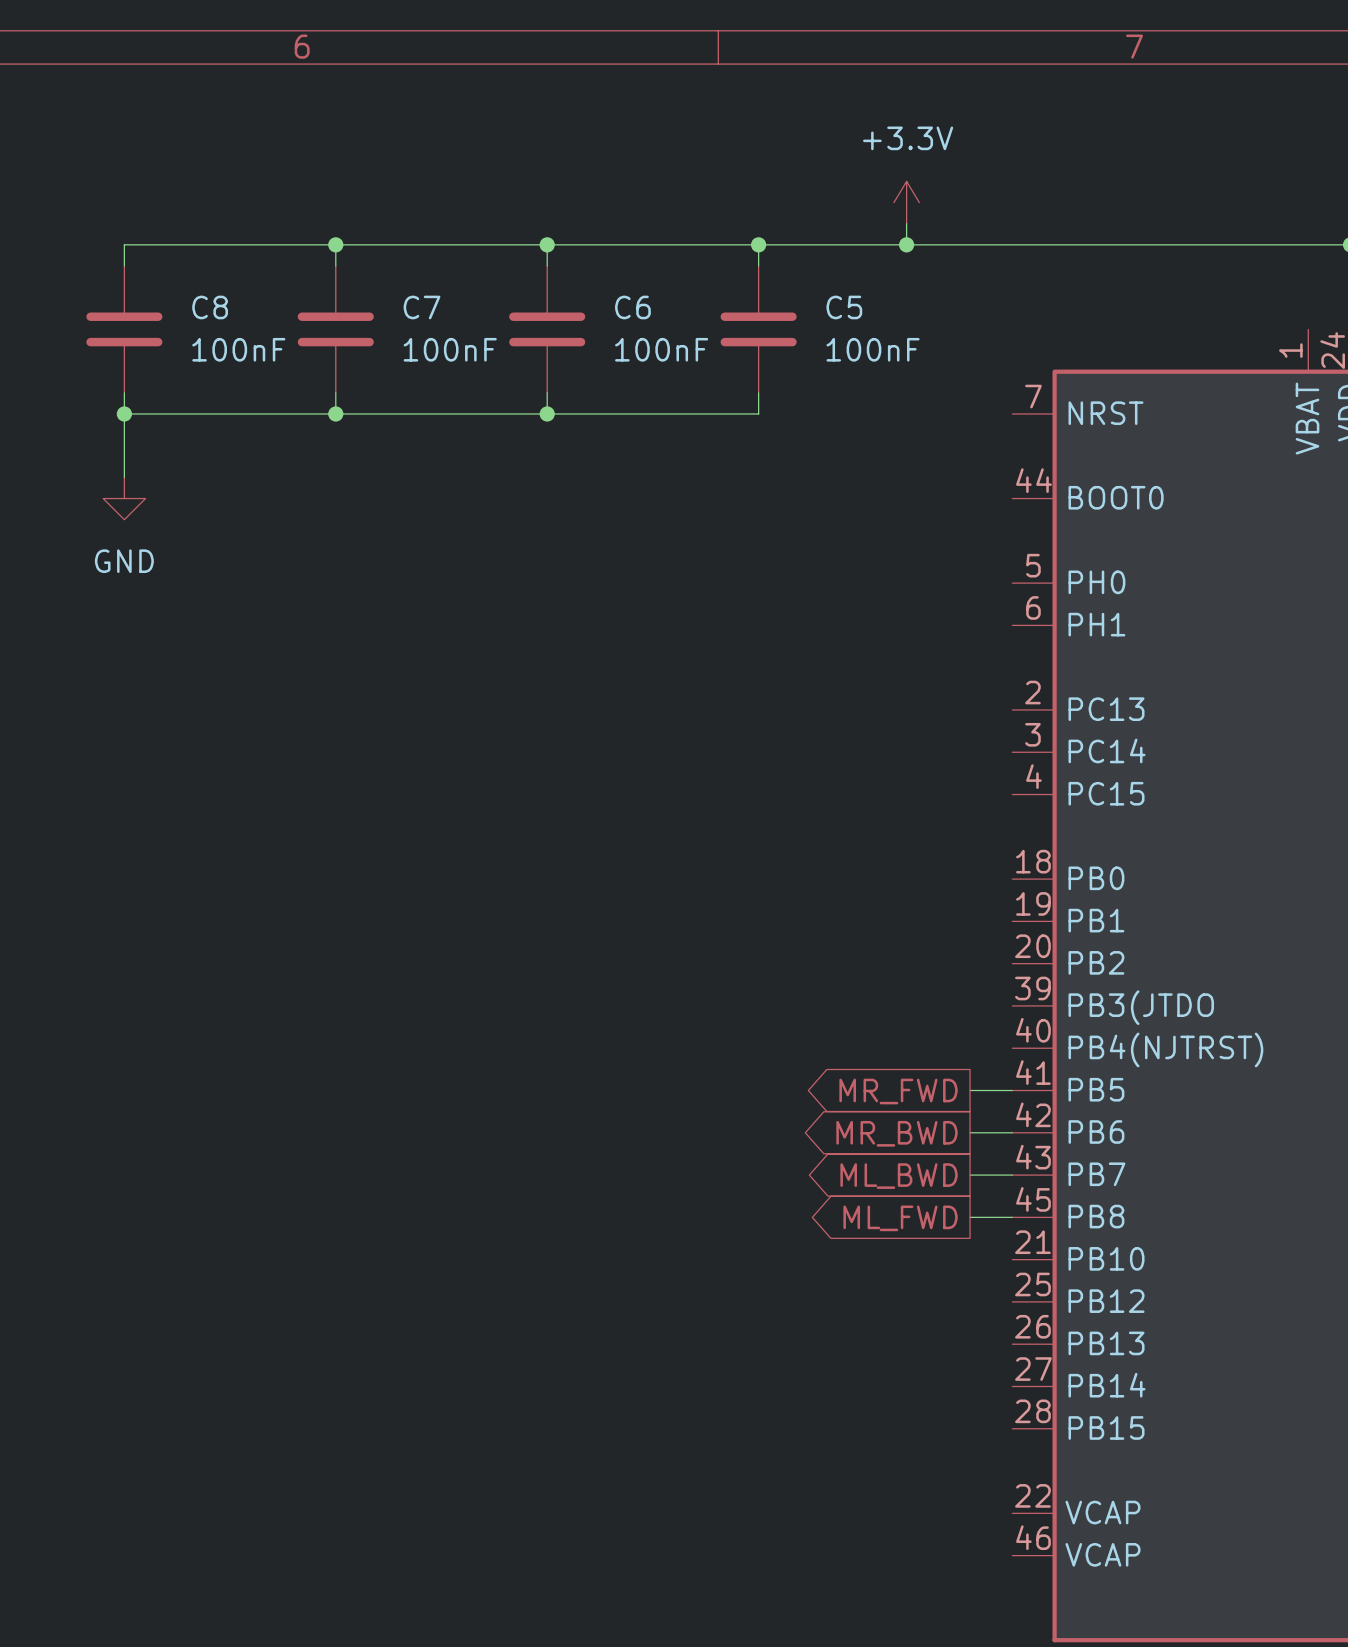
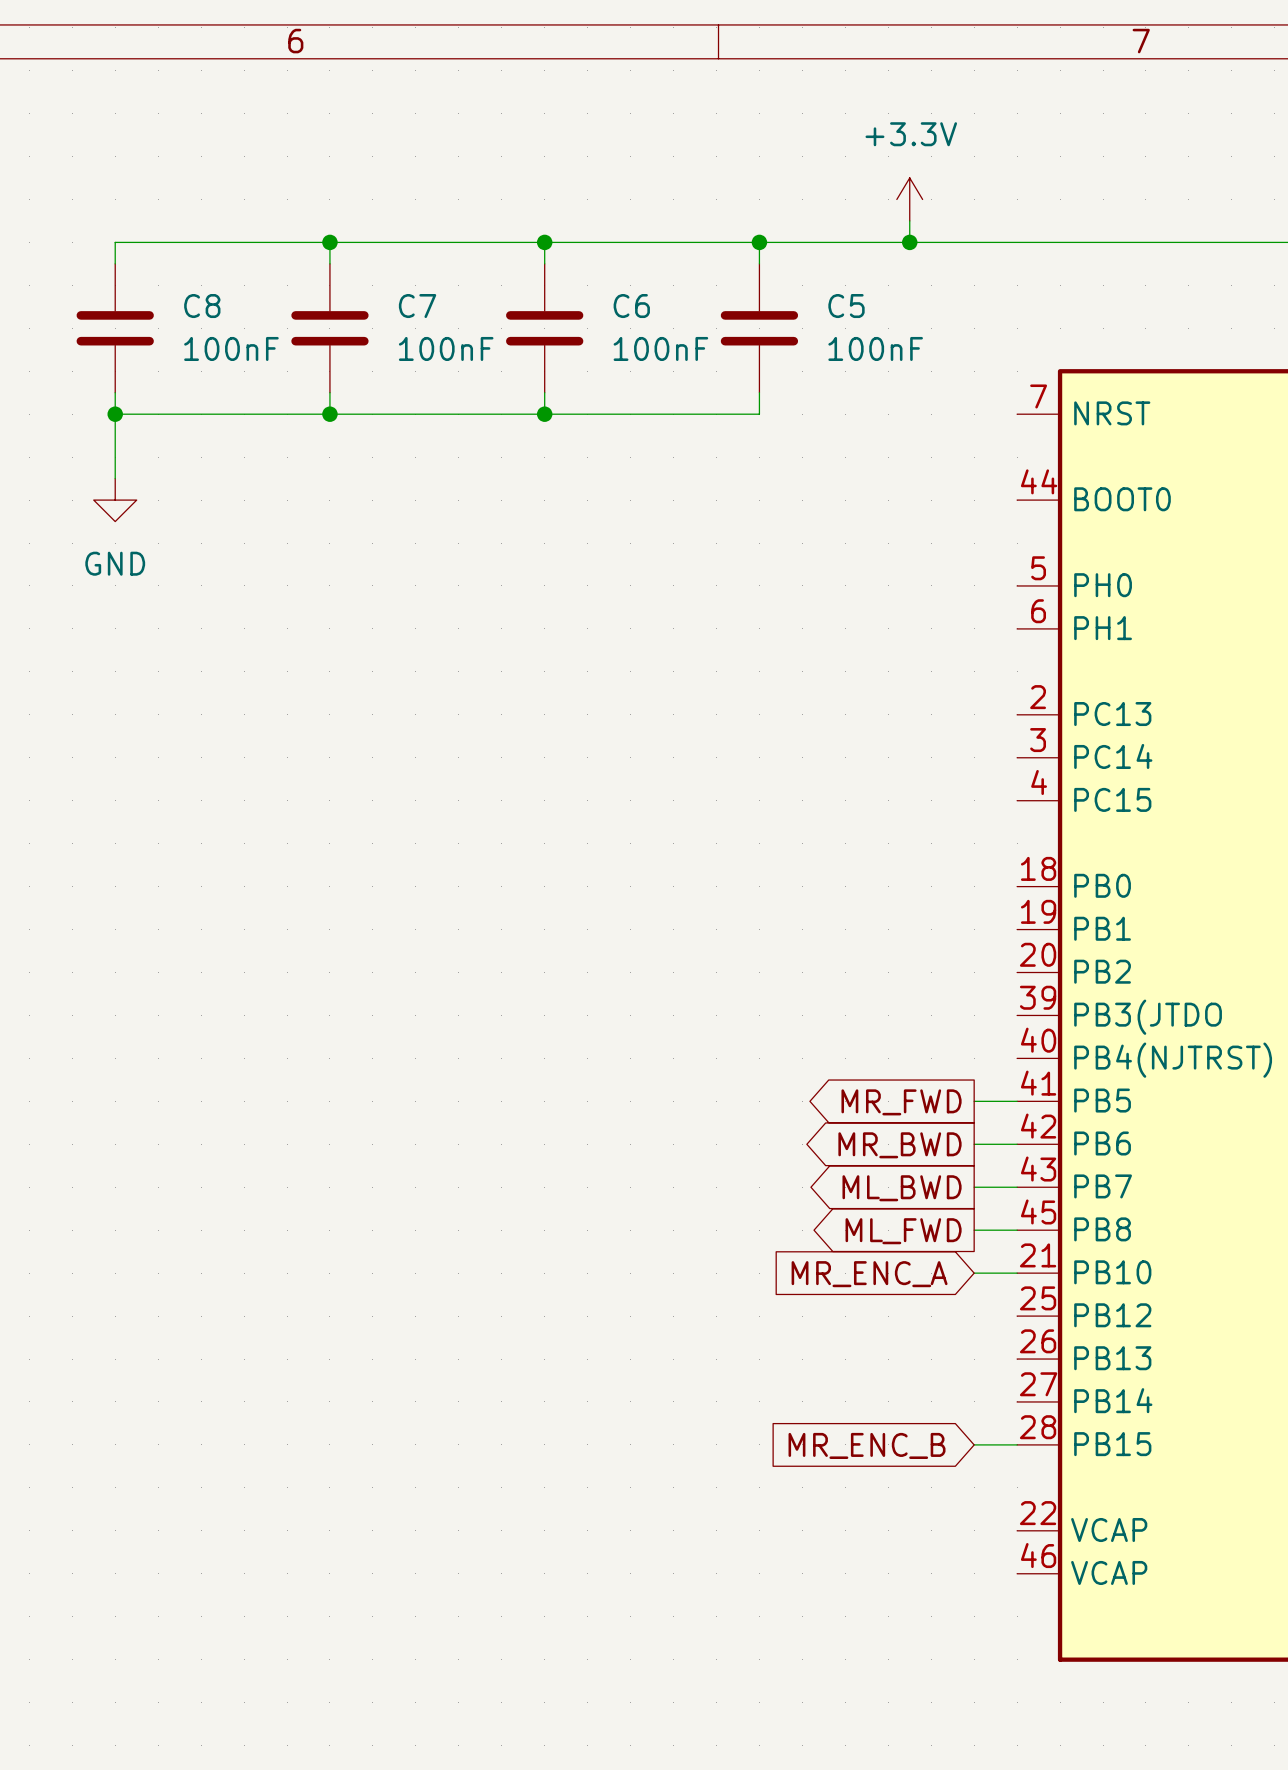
wire: none -> (974, 1273) (1017, 1273)
global label: none -> MR_ENC_A (869, 1274)
wire: none -> (974, 1444) (1017, 1444)
global label: none -> MR_ENC_B (867, 1445)

